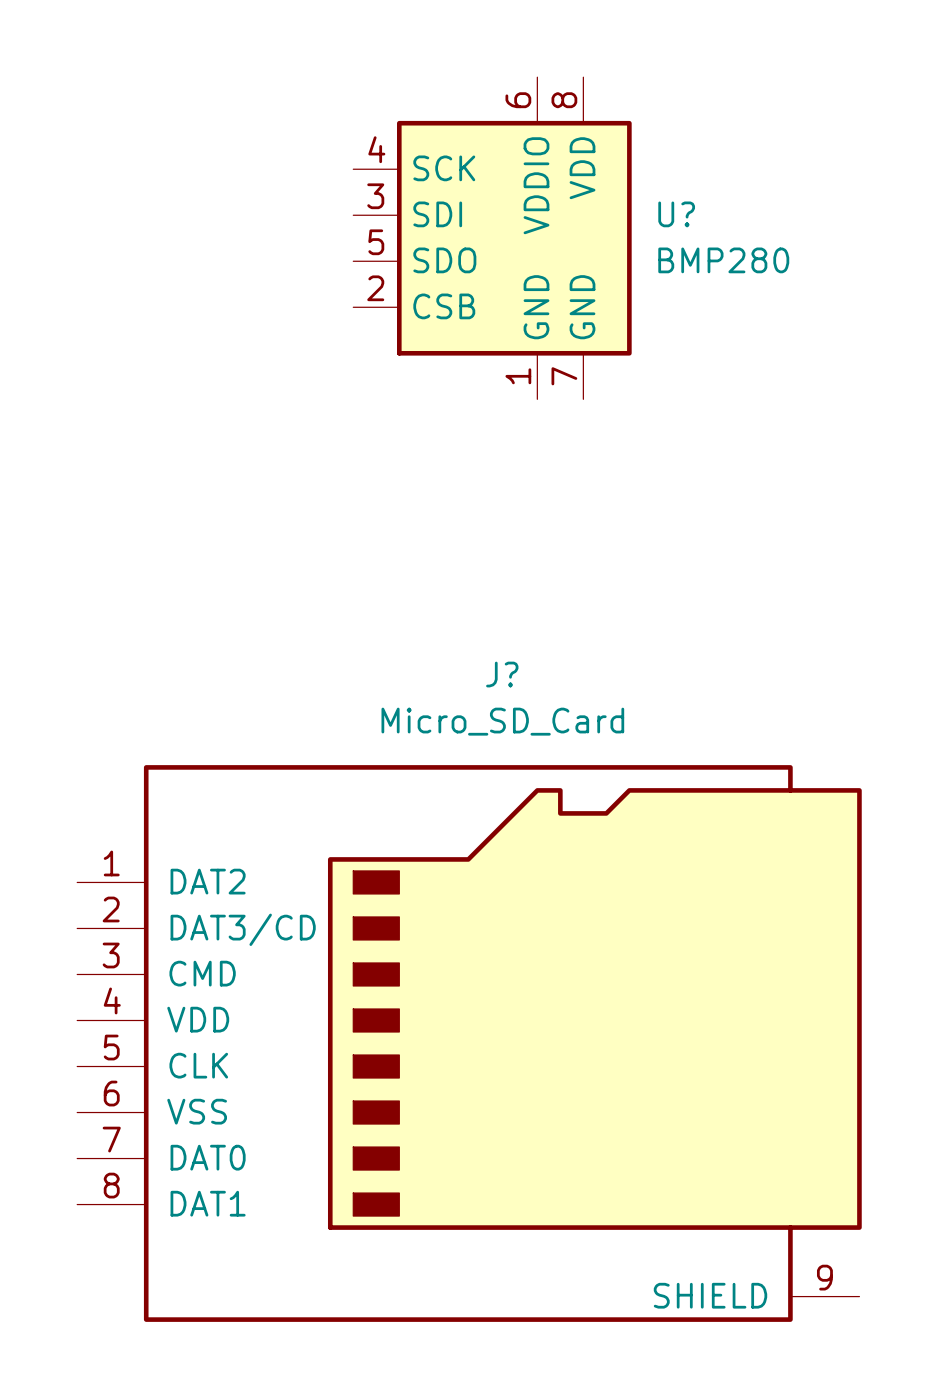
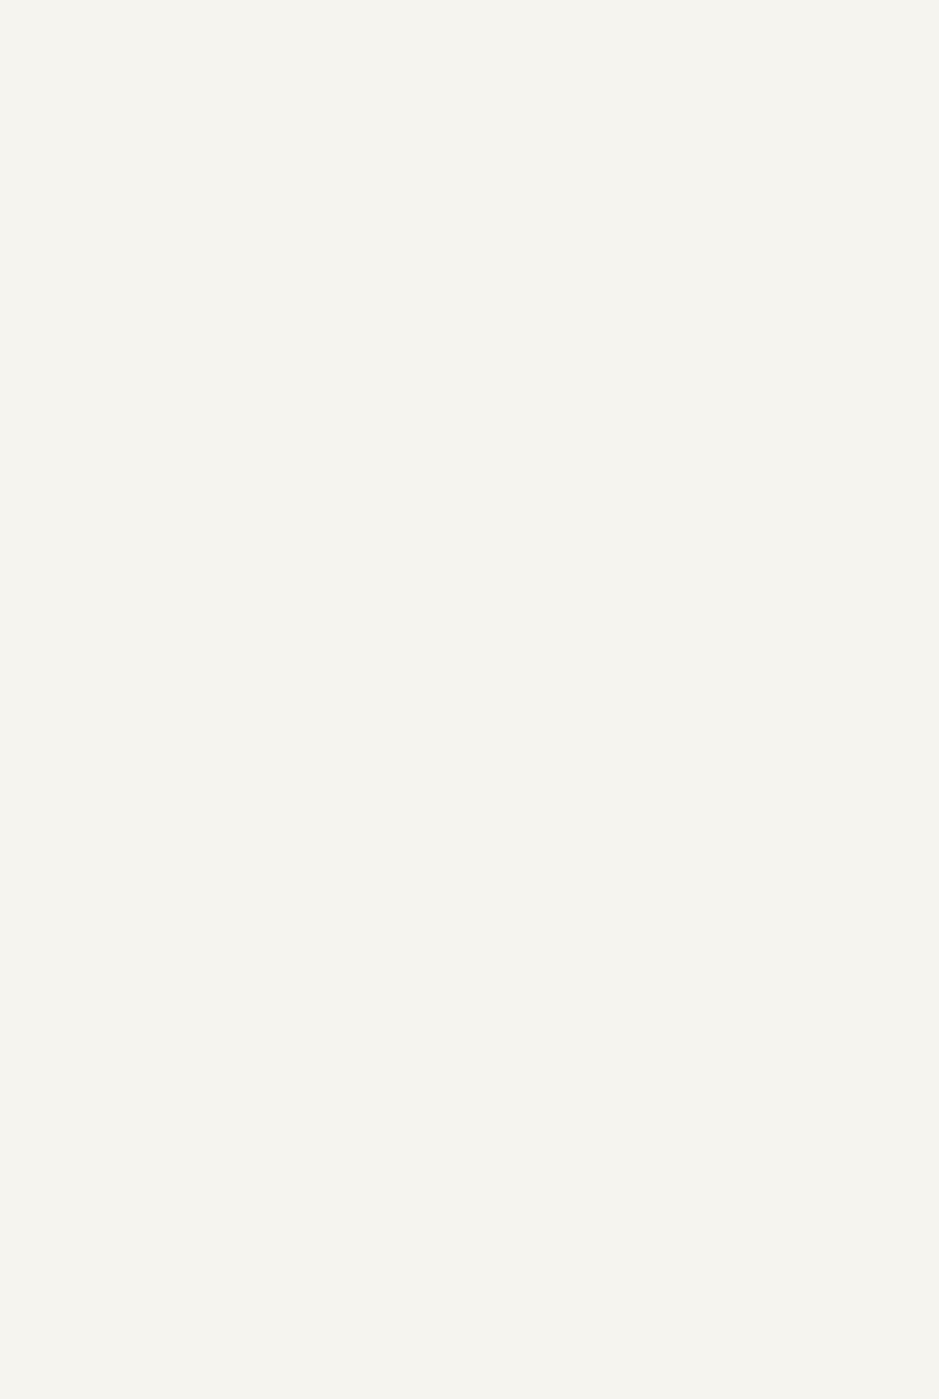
U?: BMP280 (492, 238) -> none
J?: Micro_SD_Card (469, 1043) -> none

